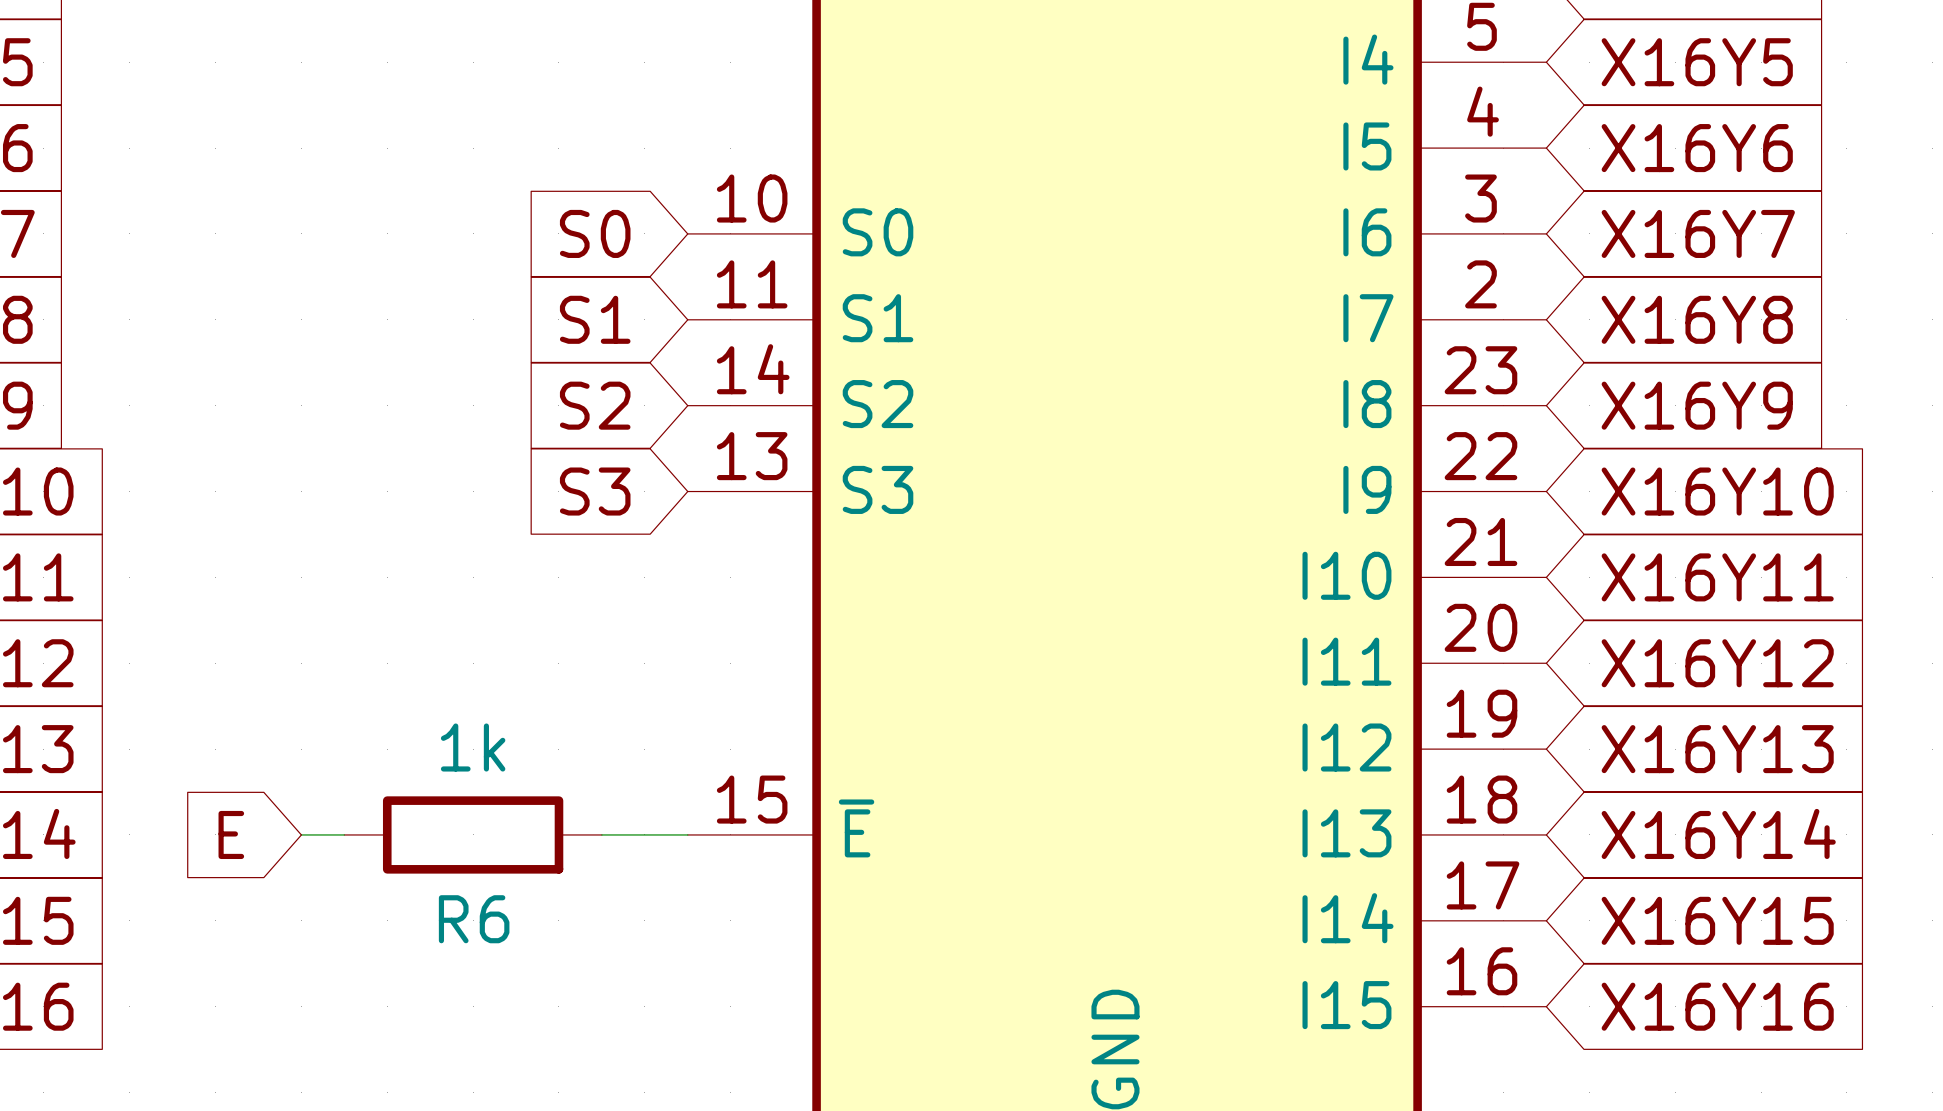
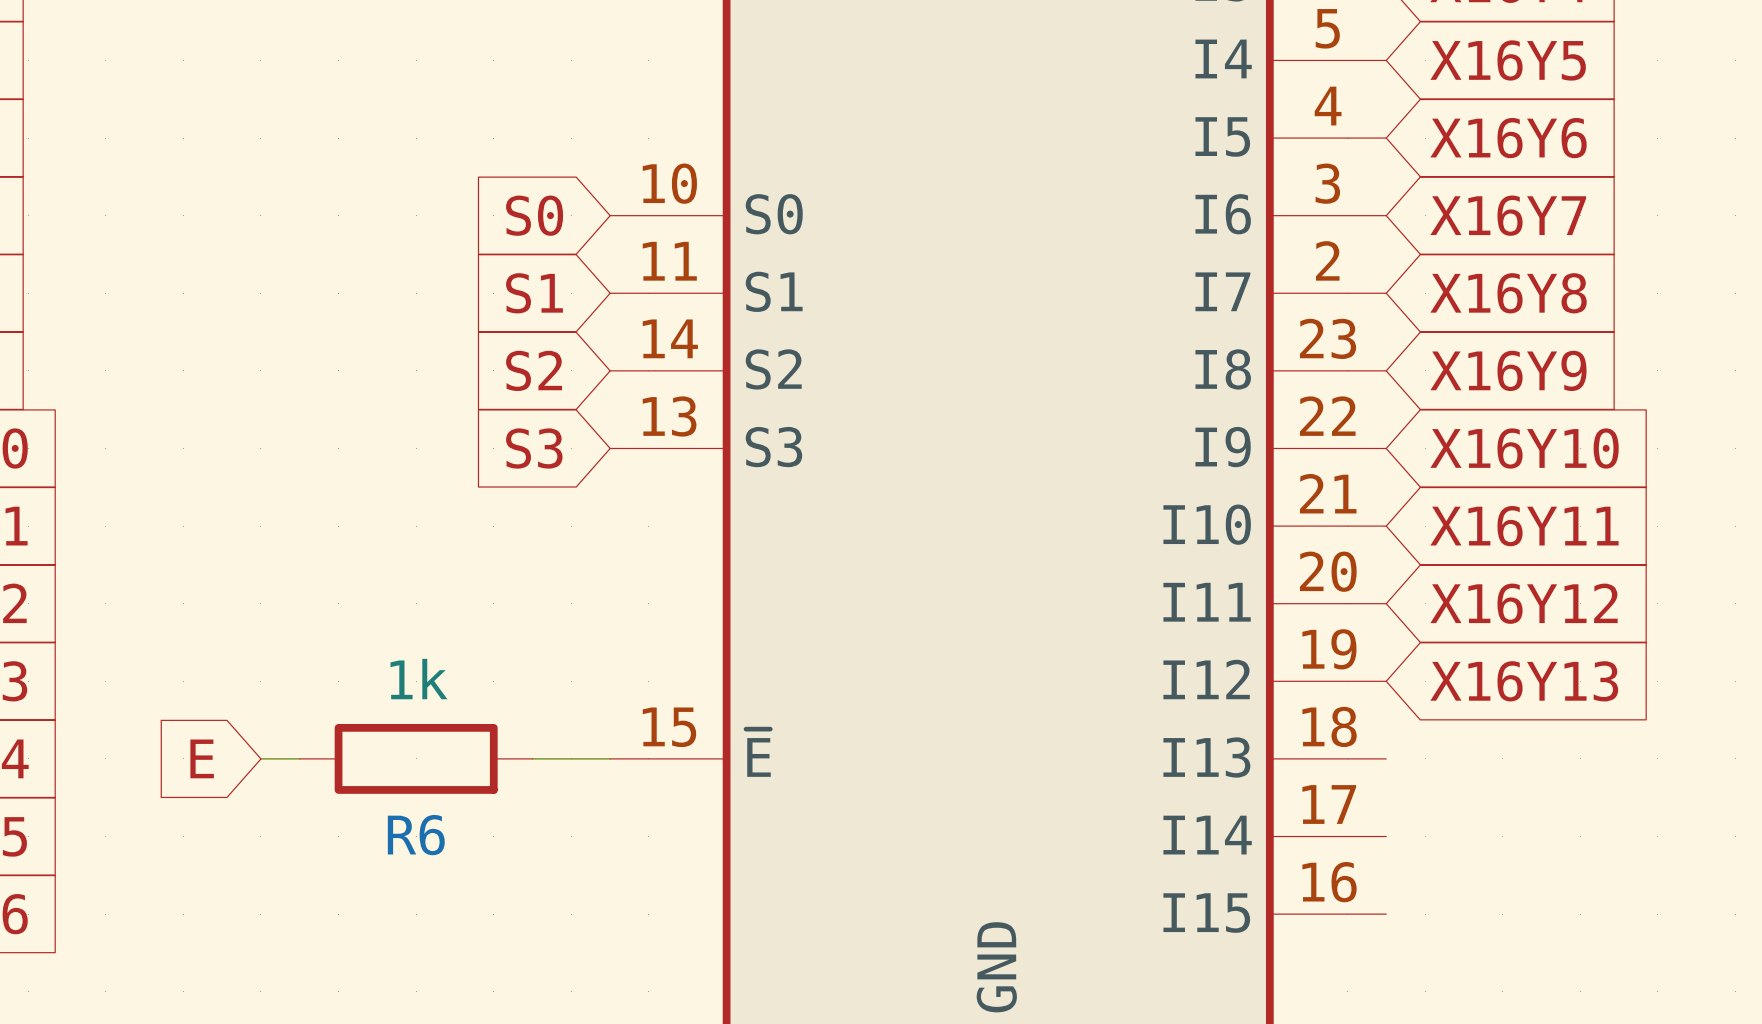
global label: X16Y14 (1718, 833) -> none
global label: X16Y15 (1717, 920) -> none
global label: X16Y16 (1717, 1006) -> none

